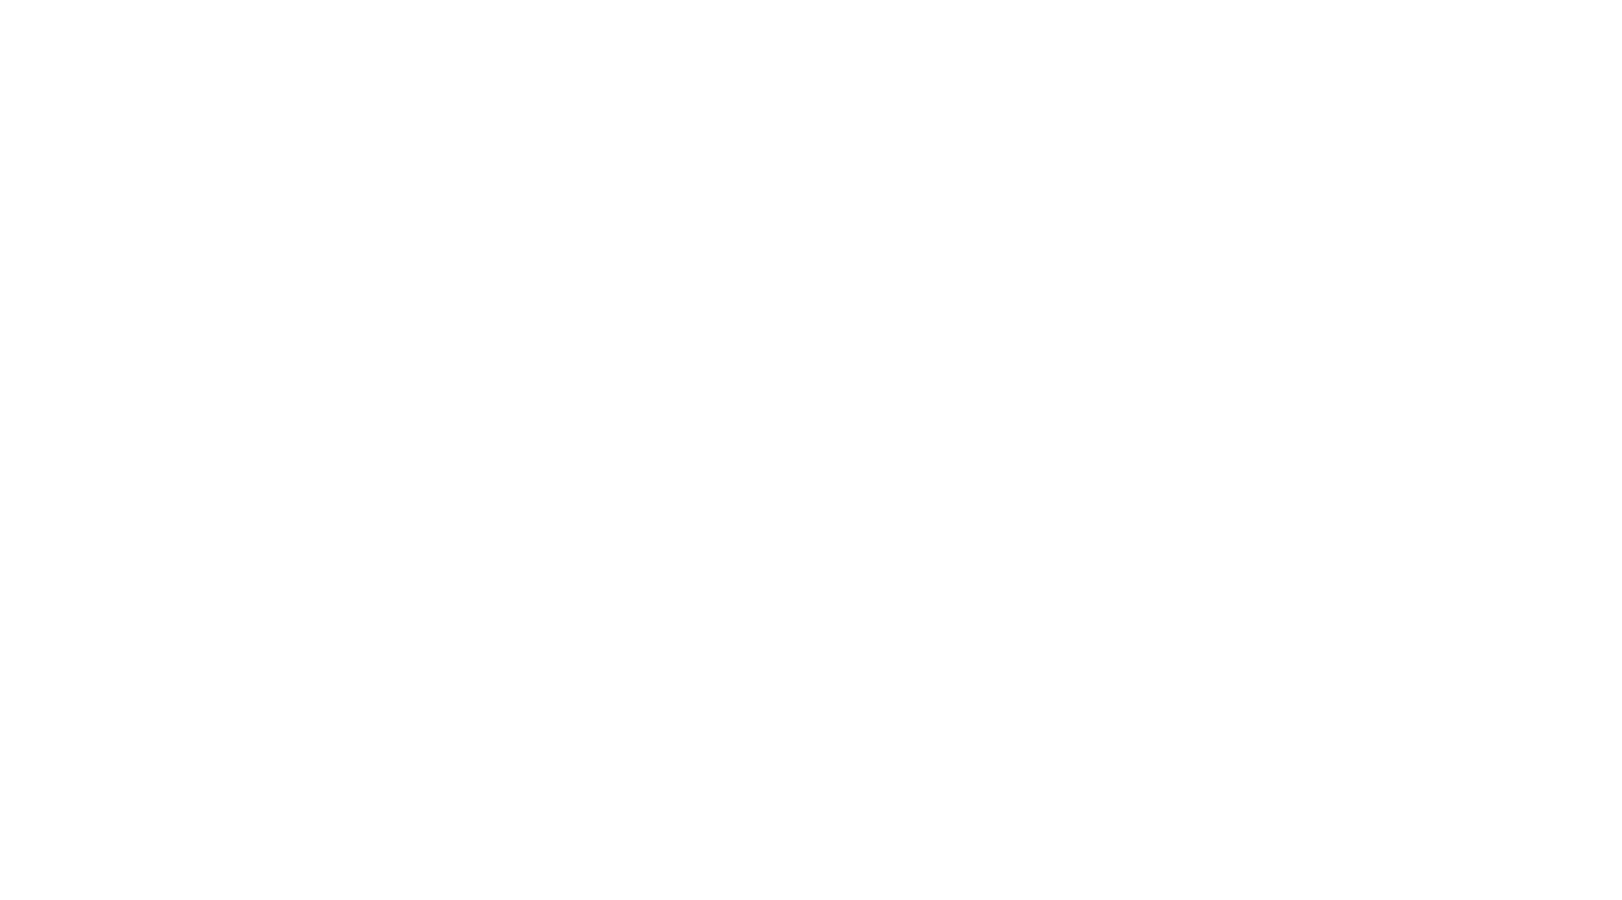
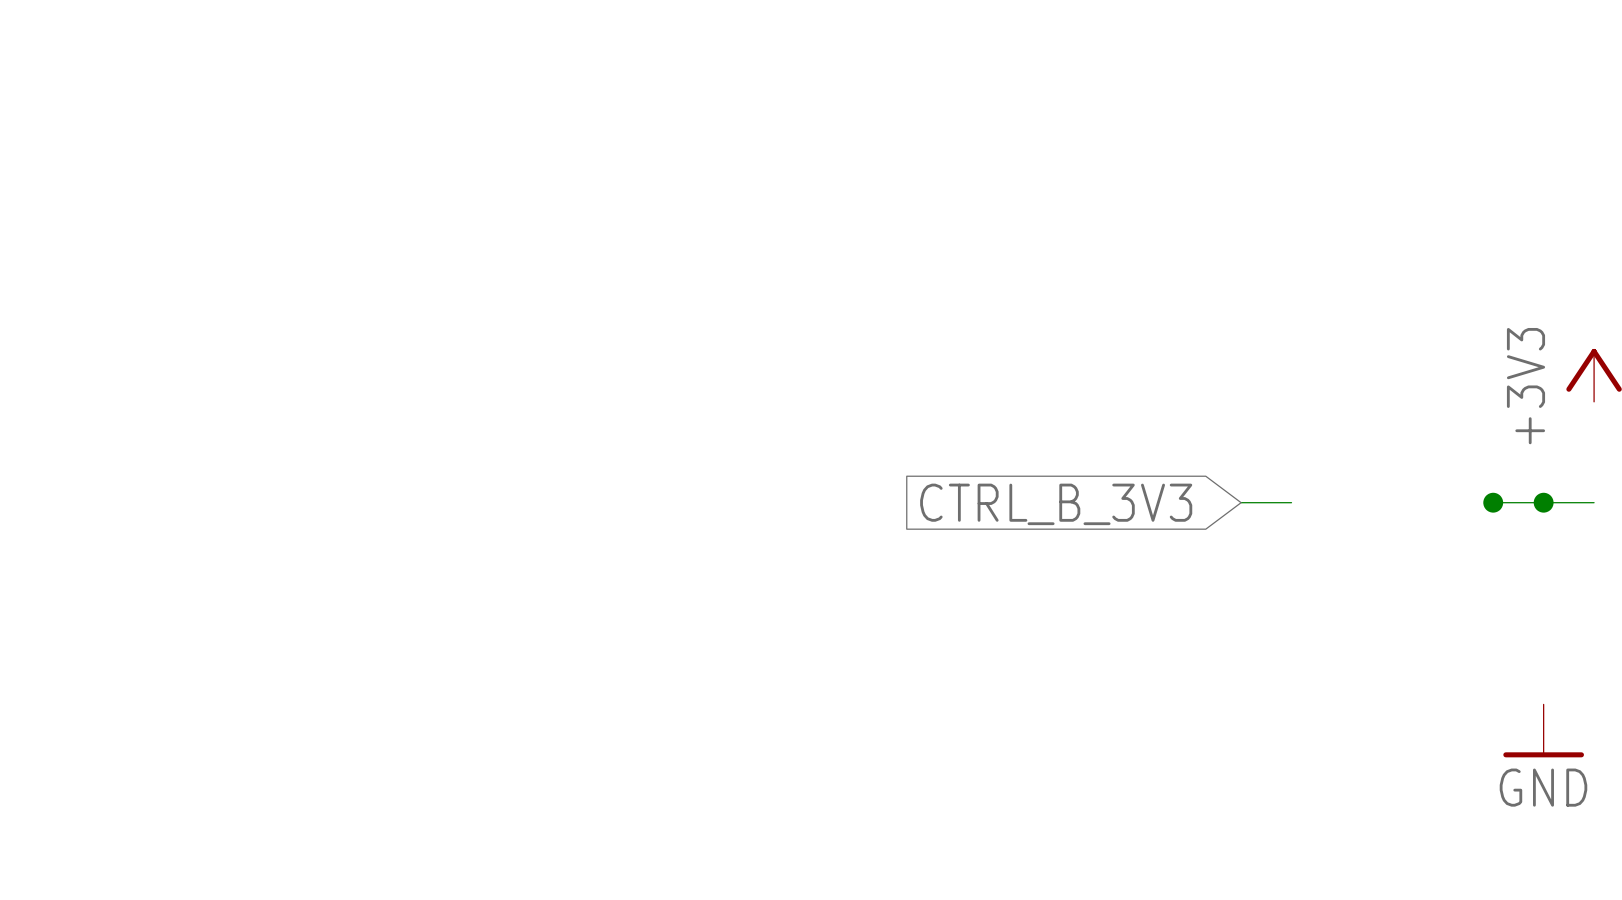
power symbol: none -> +3V3 (1594, 375)
wire: none -> (1241, 502) (1291, 502)
wire: none -> (1493, 502) (1594, 502)
junction: none -> (1493, 502)
junction: none -> (1543, 502)
global label: none -> CTRL_B_3V3 (1056, 504)
power symbol: none -> GND (1543, 730)

